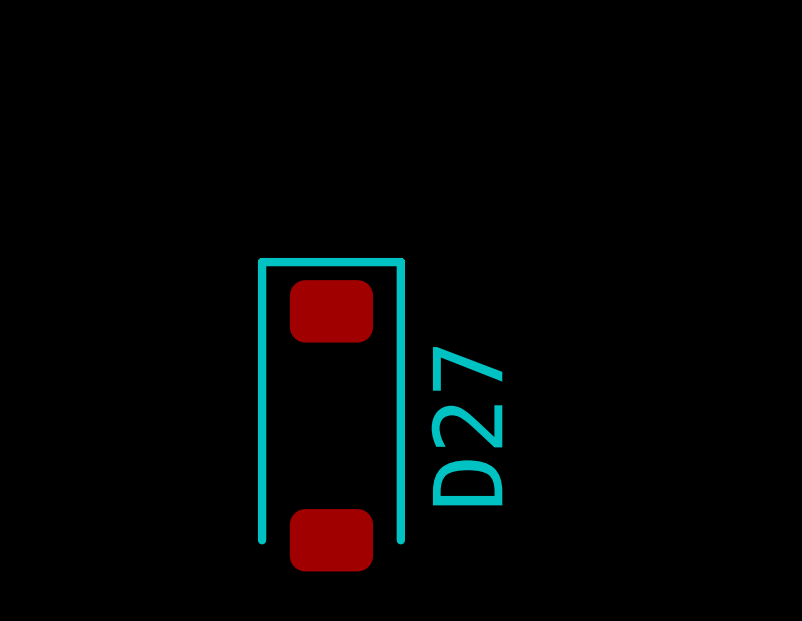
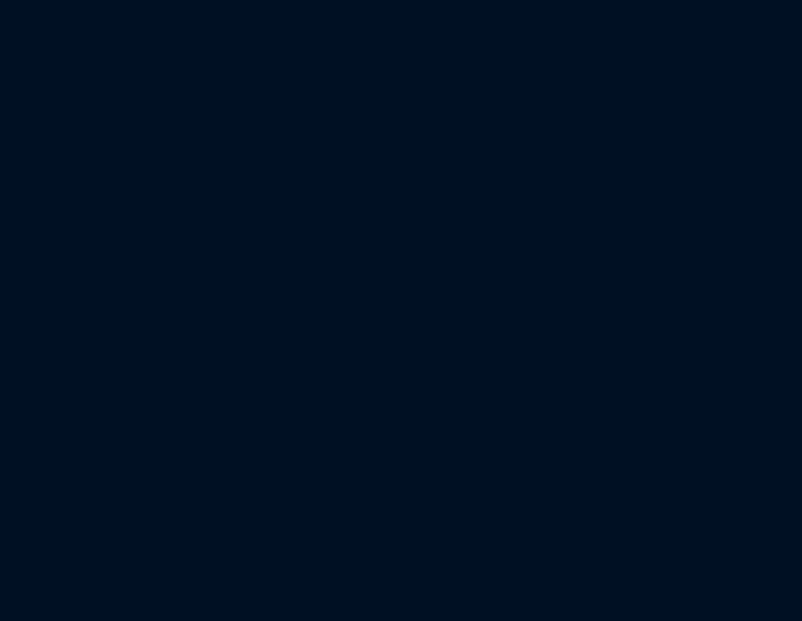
D27: (331, 414) -> none

